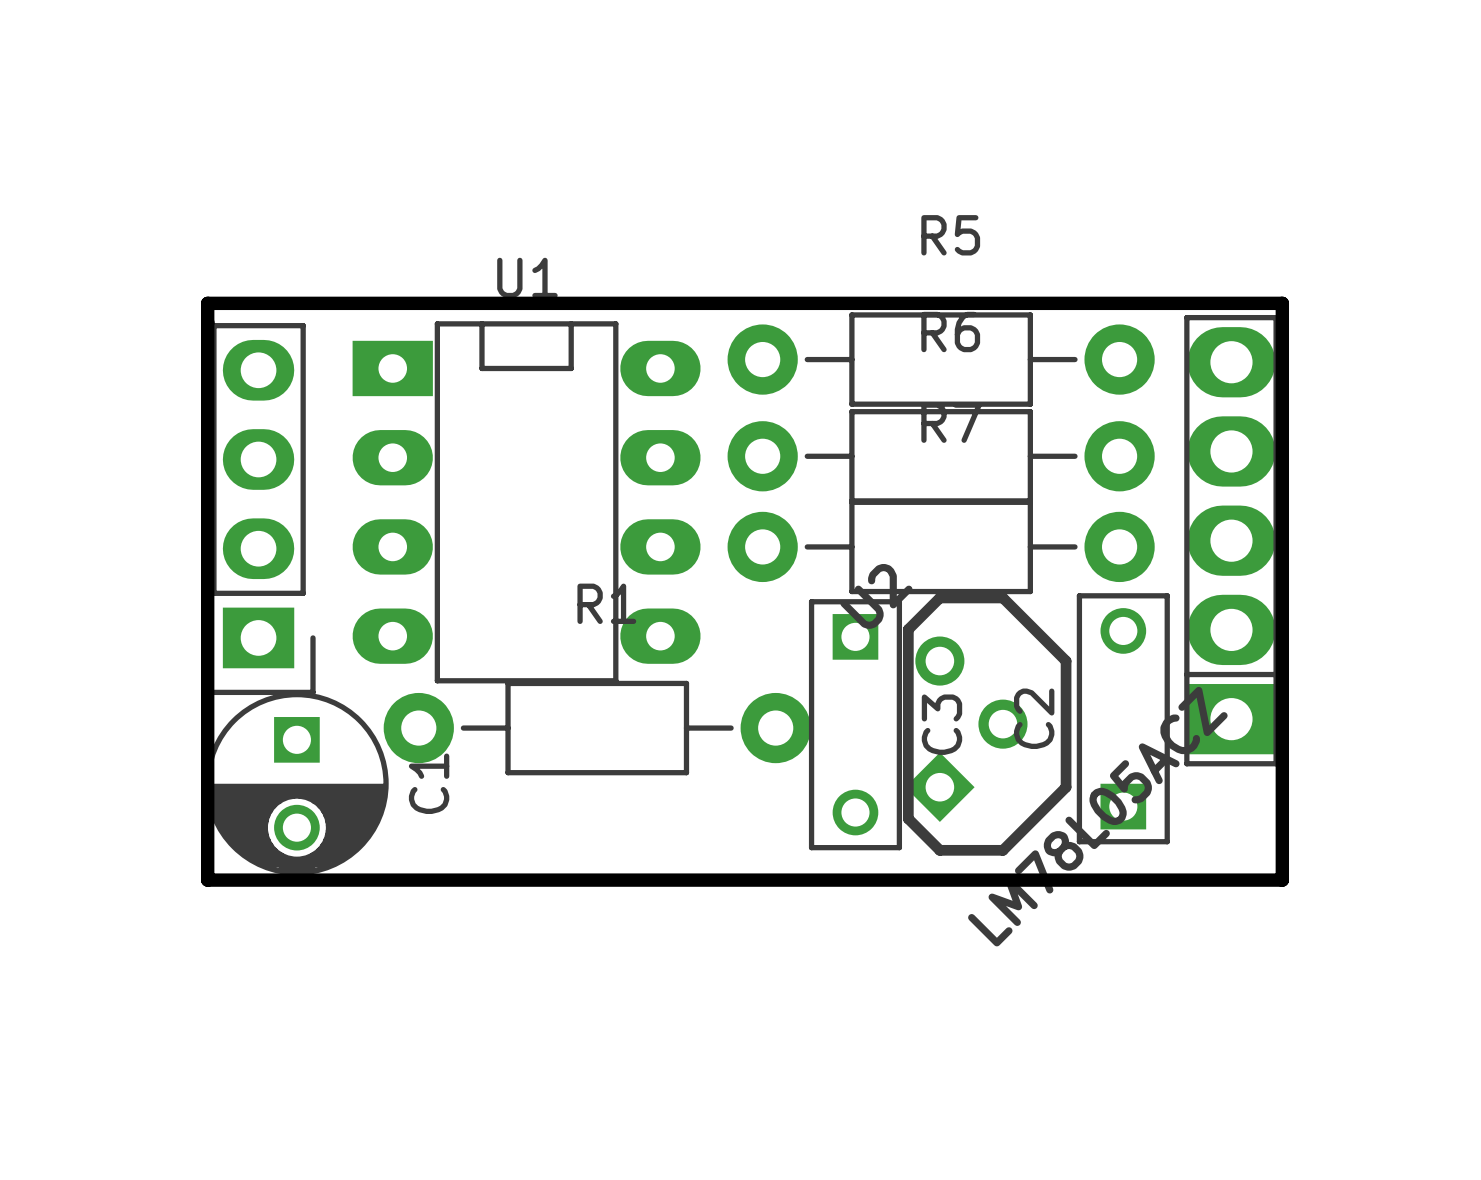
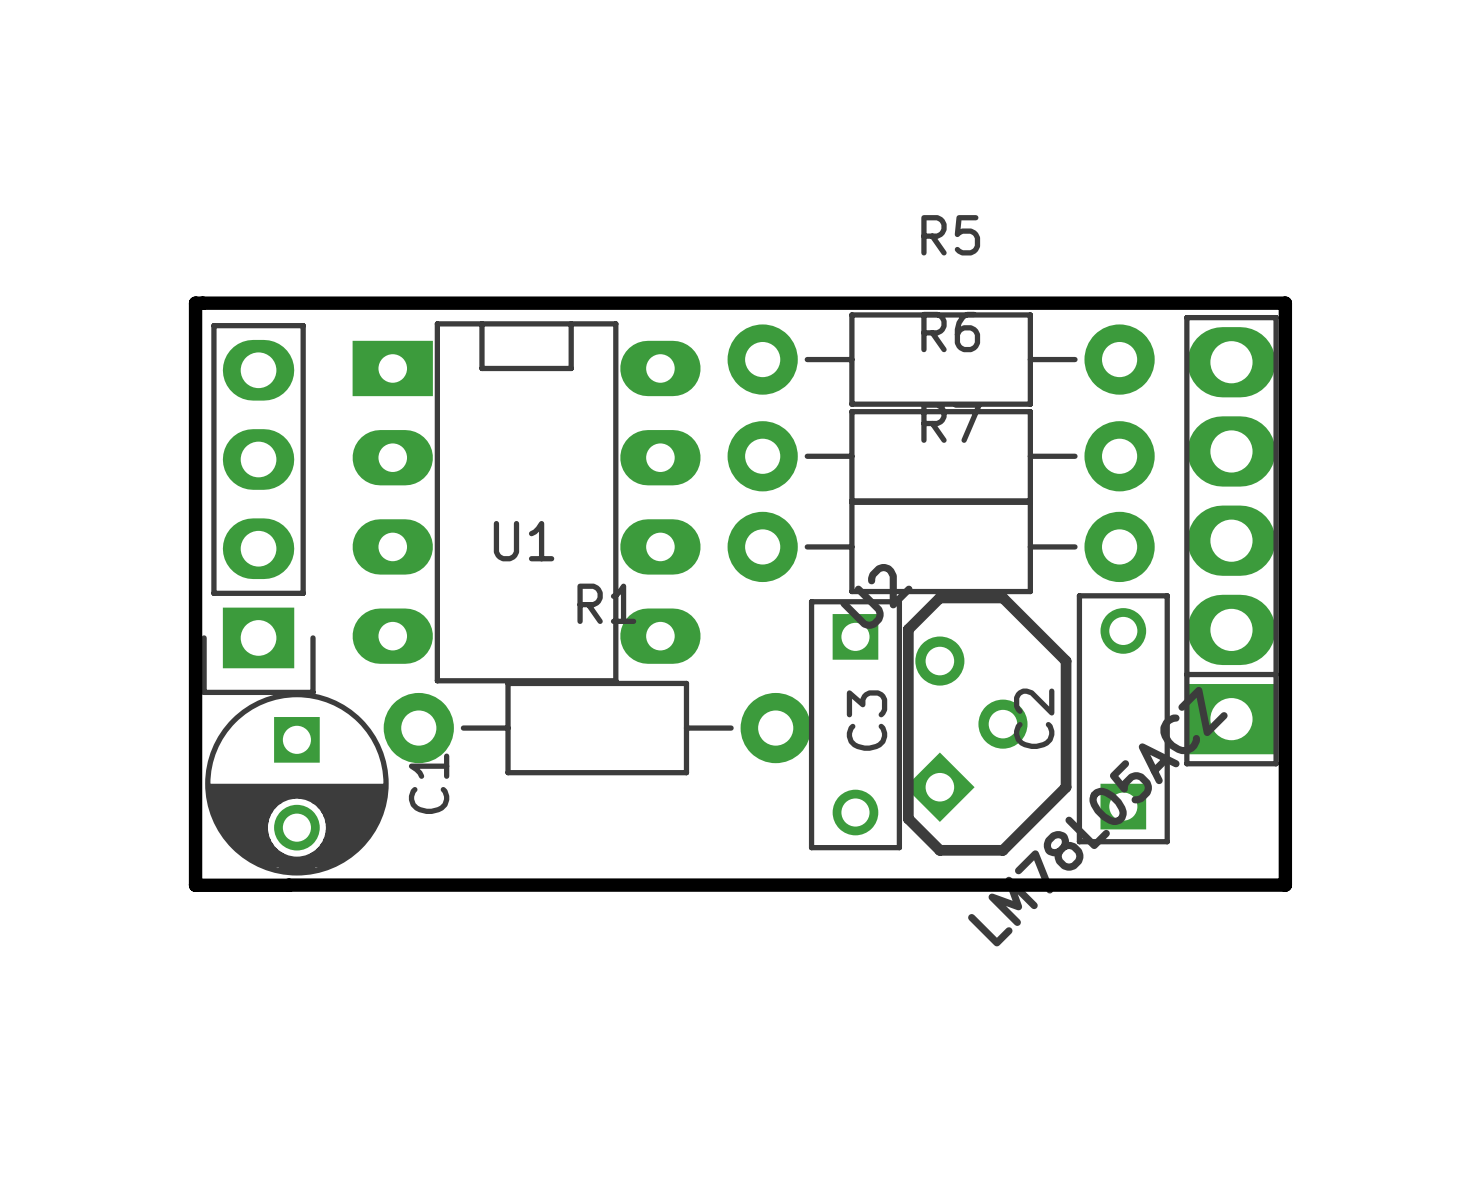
U1 name position: U1 (527, 277) -> U1 (524, 541)
board edge: (207, 303) (207, 880) (1282, 880) (1282, 303) (207, 303) -> (195, 303) (195, 885) (1285, 885) (1285, 303) (195, 303)
C3 name position: C3 (941, 724) -> C3 (867, 720)

